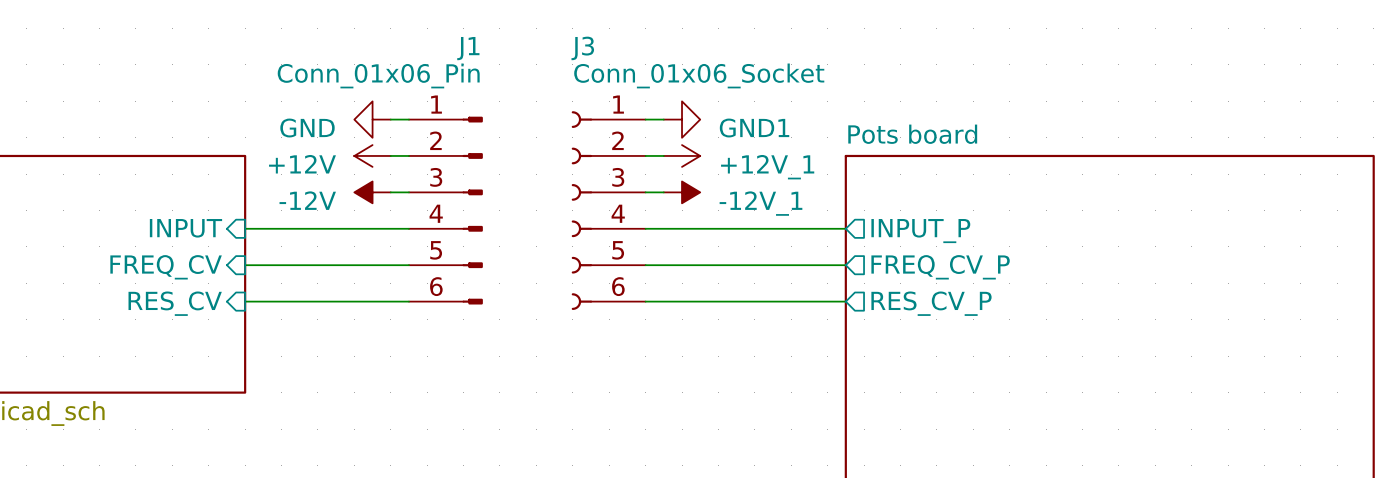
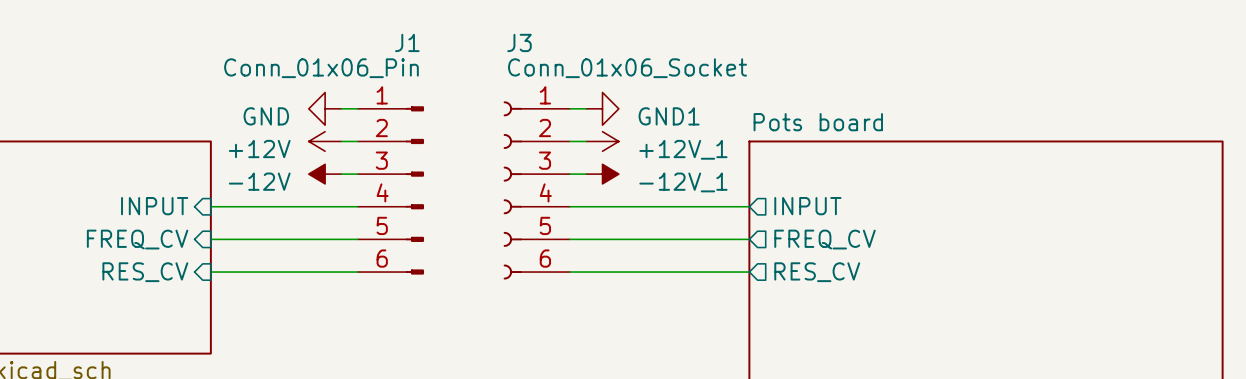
sheet pin: INPUT_P (920, 231) -> INPUT (807, 206)
sheet pin: FREQ_CV_P (940, 267) -> FREQ_CV (825, 239)
sheet pin: RES_CV_P (931, 303) -> RES_CV (817, 272)

